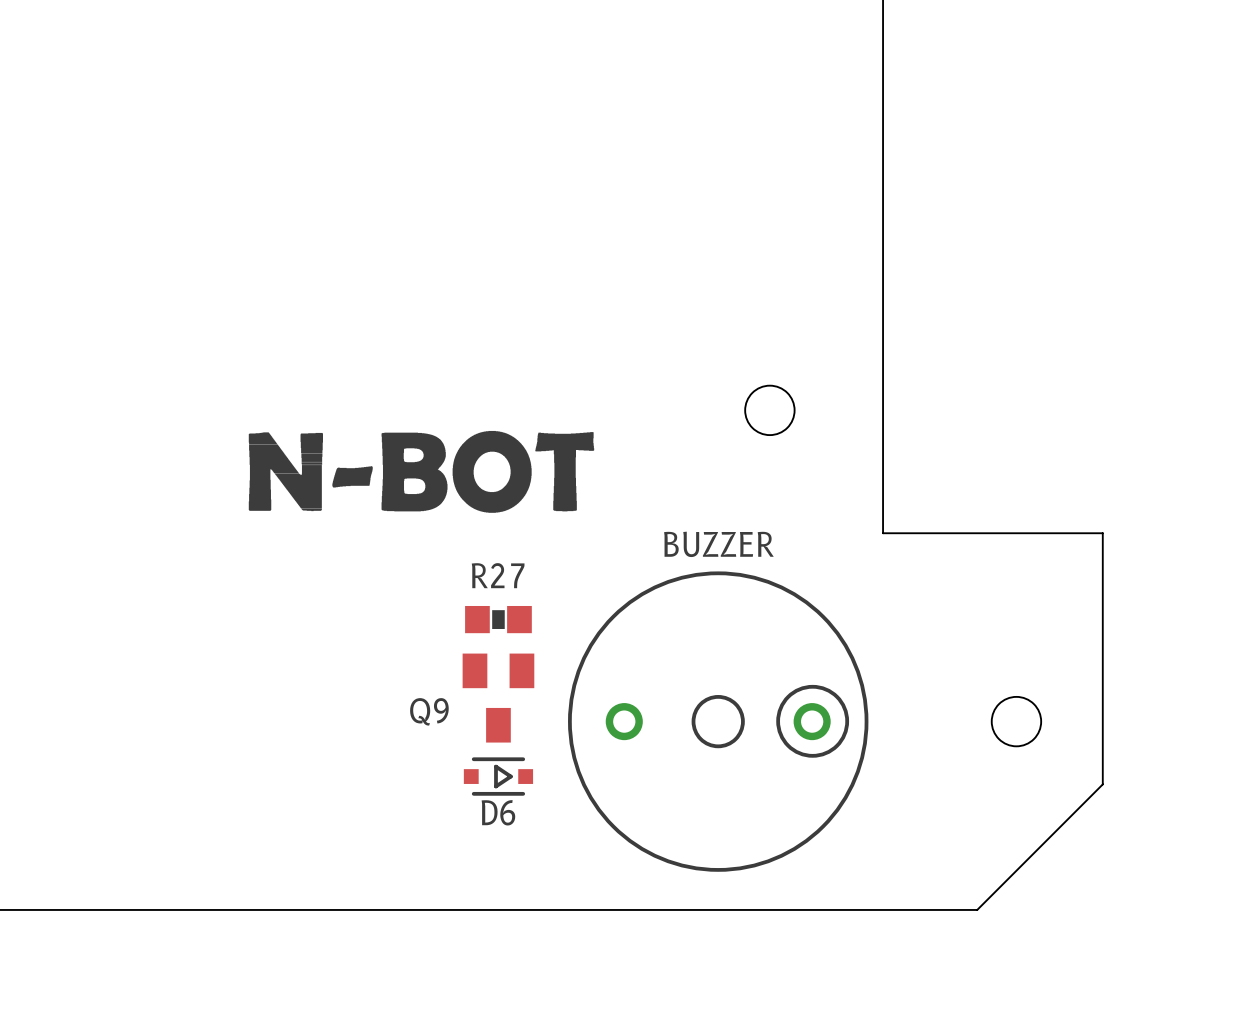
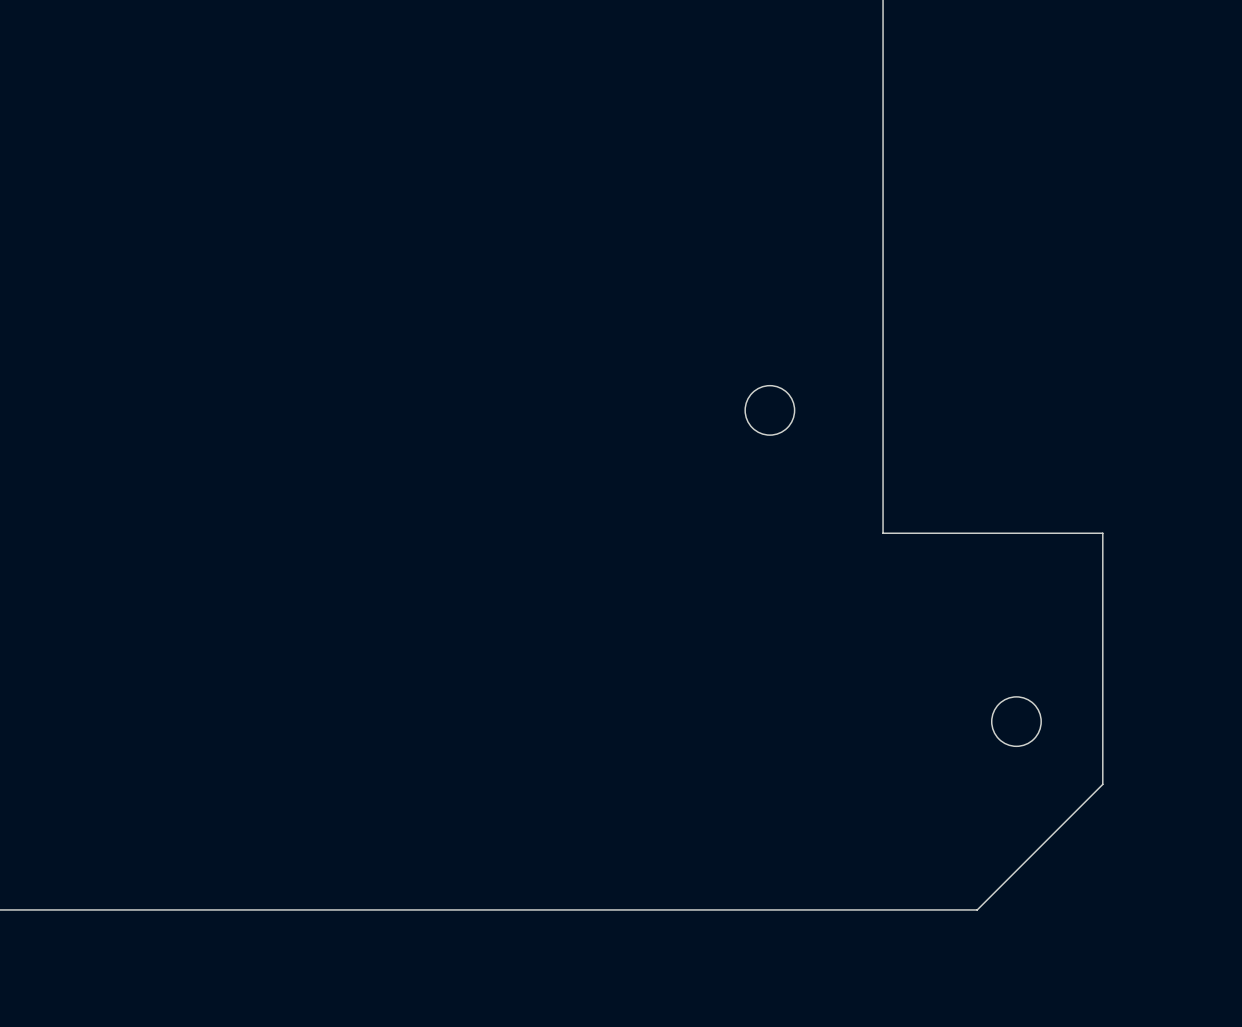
drawing: [248, 430, 595, 513] -> none
R27: (498, 619) -> none
Q9: (498, 698) -> none
BUZZER: (718, 721) -> none
D6: (498, 776) -> none

